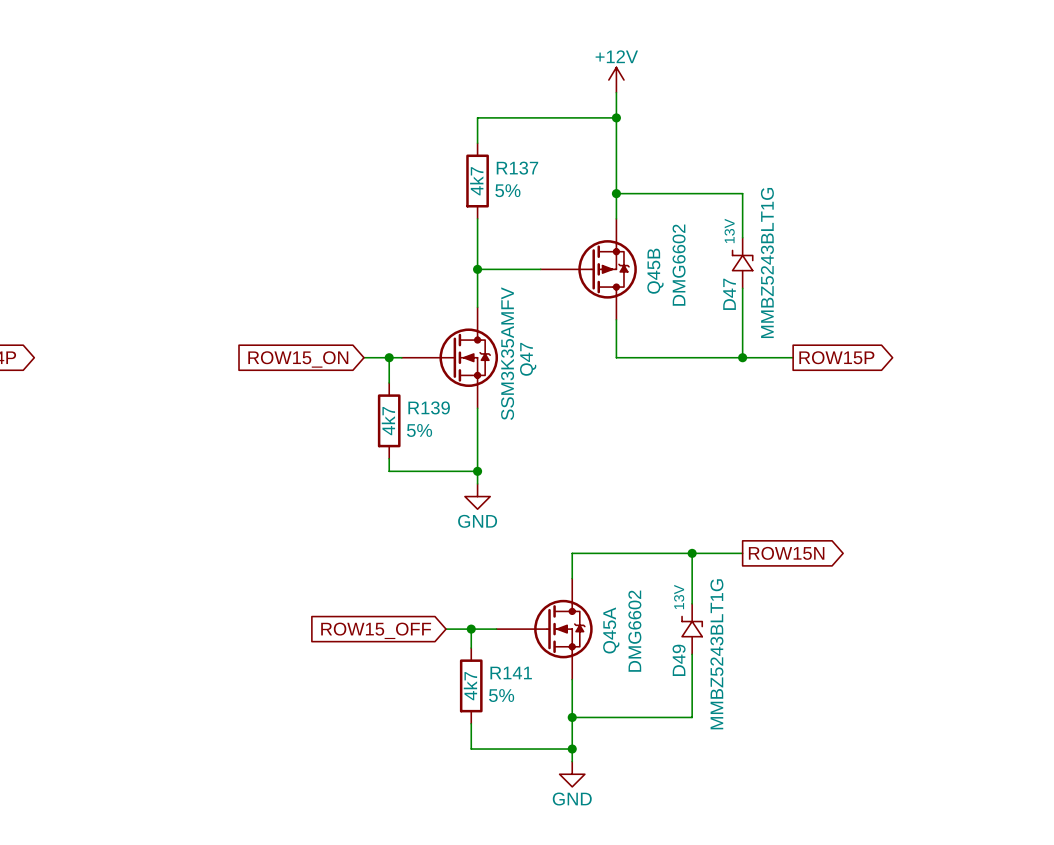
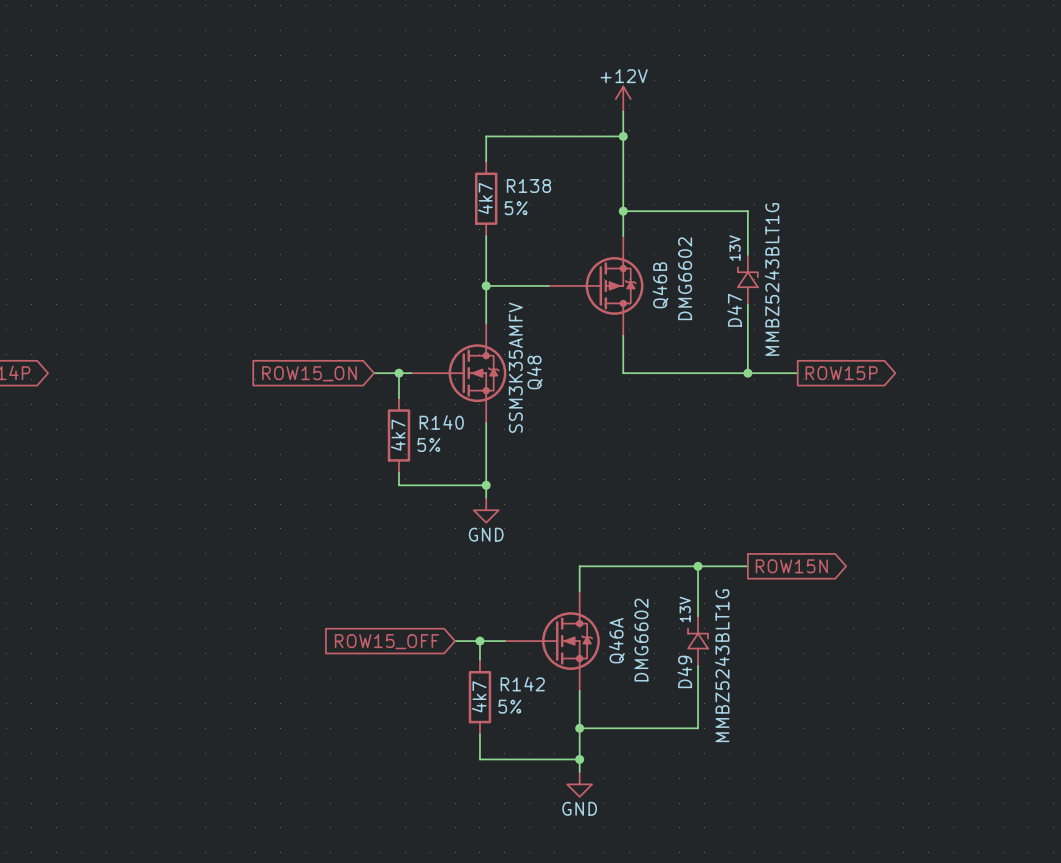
R137 name: R137 (517, 168) -> R138 (528, 185)
Q45B name: Q45B (655, 271) -> Q46B (660, 285)
Q47 name: Q47 (528, 359) -> Q48 (534, 372)
R139 name: R139 (429, 407) -> R140 (441, 422)
Q45A name: Q45A (611, 630) -> Q46A (616, 640)
R141 name: R141 (511, 673) -> R142 (522, 684)

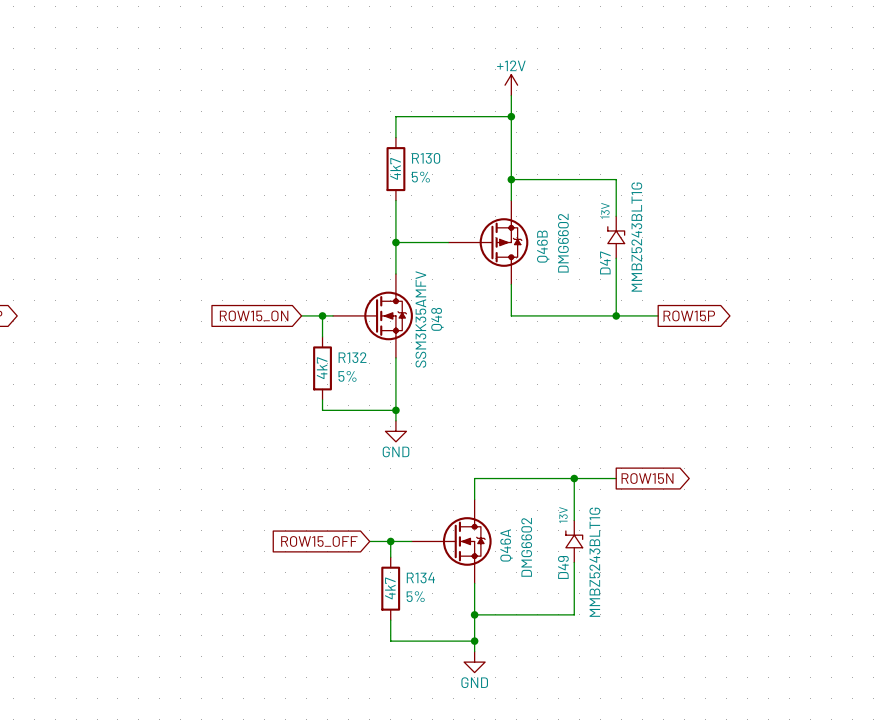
R138 name: R138 (528, 185) -> R130 (426, 158)
R140 name: R140 (441, 422) -> R132 (352, 357)
R142 name: R142 (522, 684) -> R134 (420, 578)

